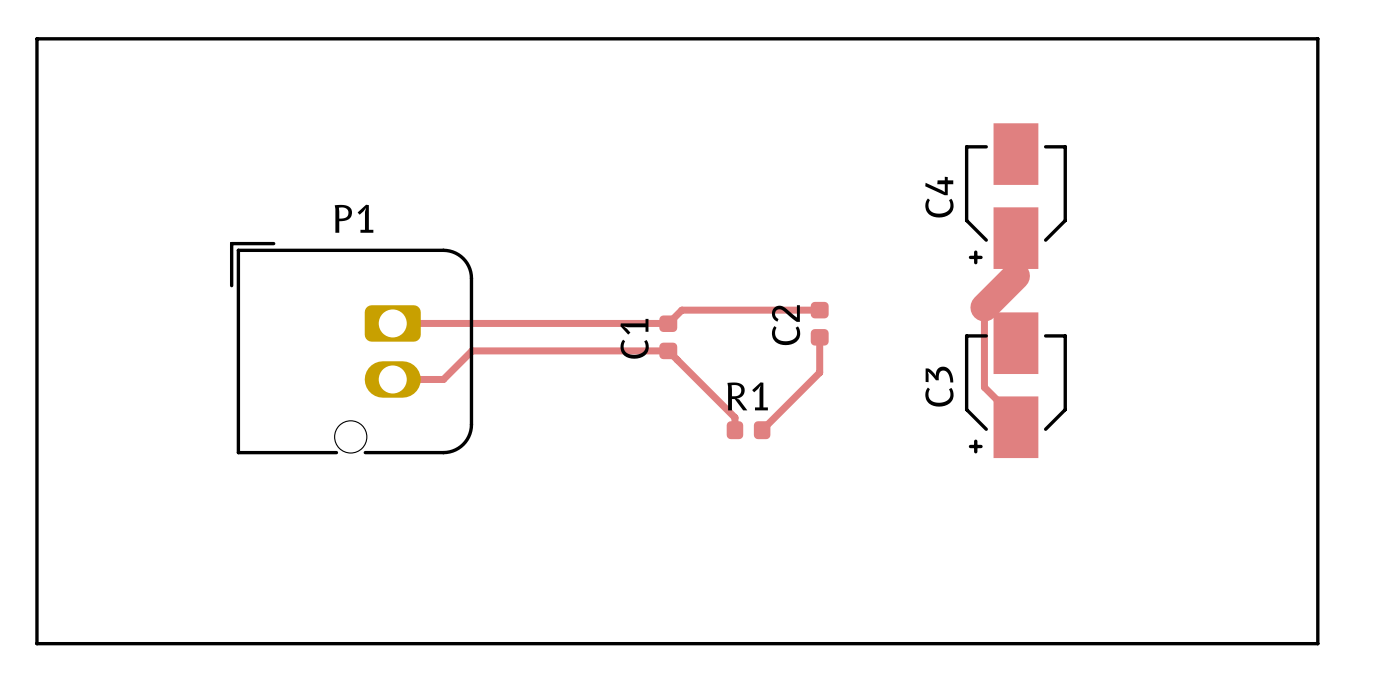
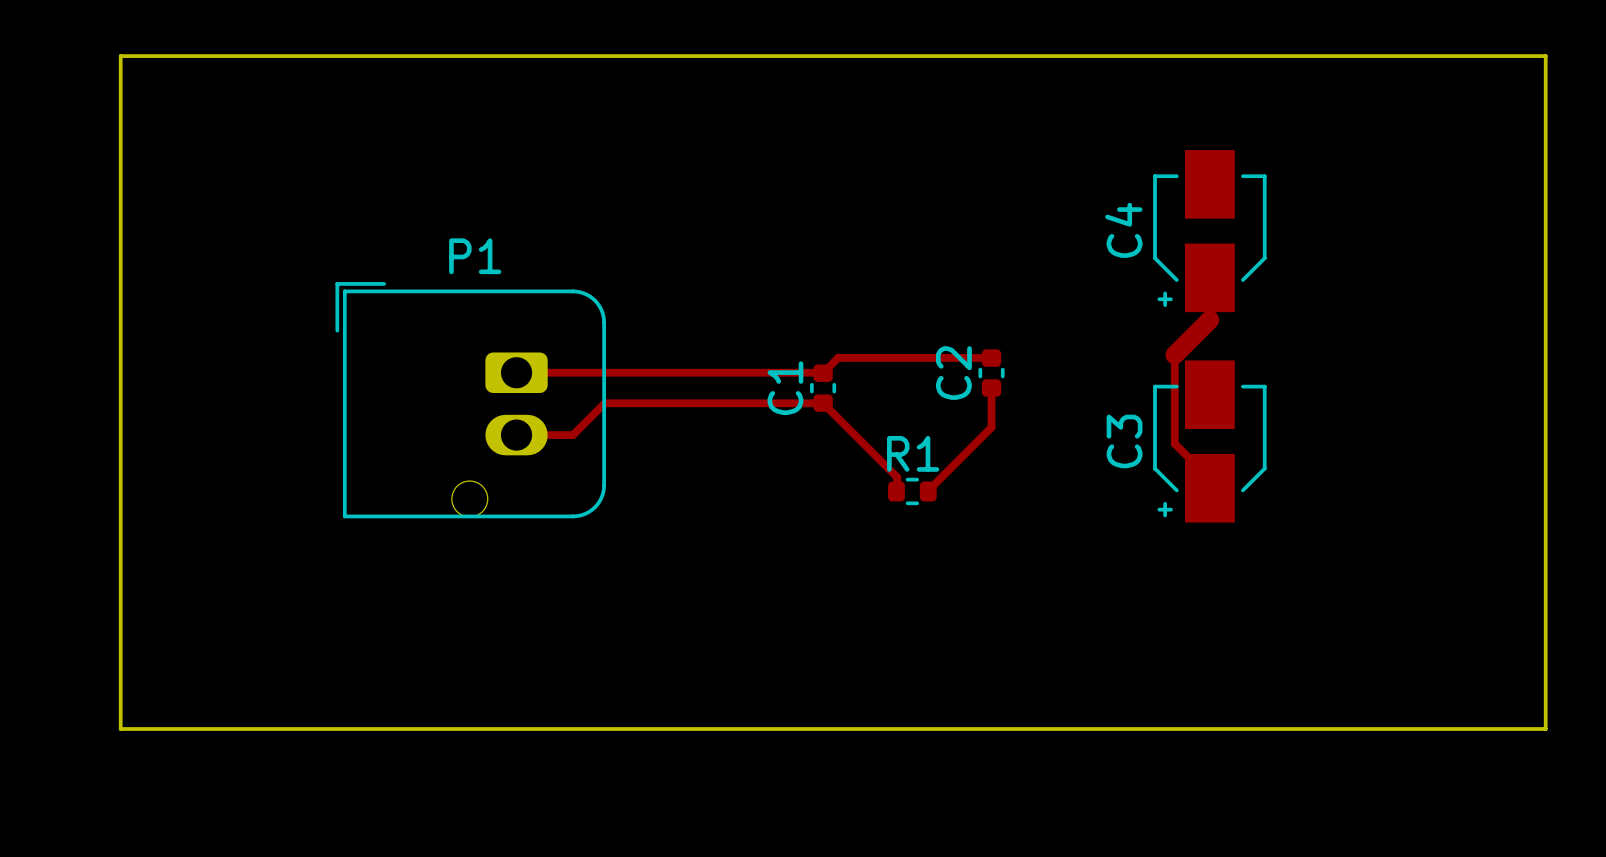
P1 footprint: [229, 241, 474, 455] -> [335, 282, 606, 519]
track width: thick (1015, 275) (984, 307) -> thin (1209, 319) (1174, 354)
C2 footprint: [810, 301, 829, 346] -> [978, 349, 1005, 397]
C1 footprint: [659, 315, 678, 360] -> [809, 364, 837, 412]
R1 footprint: [726, 421, 771, 440] -> [888, 477, 937, 506]

